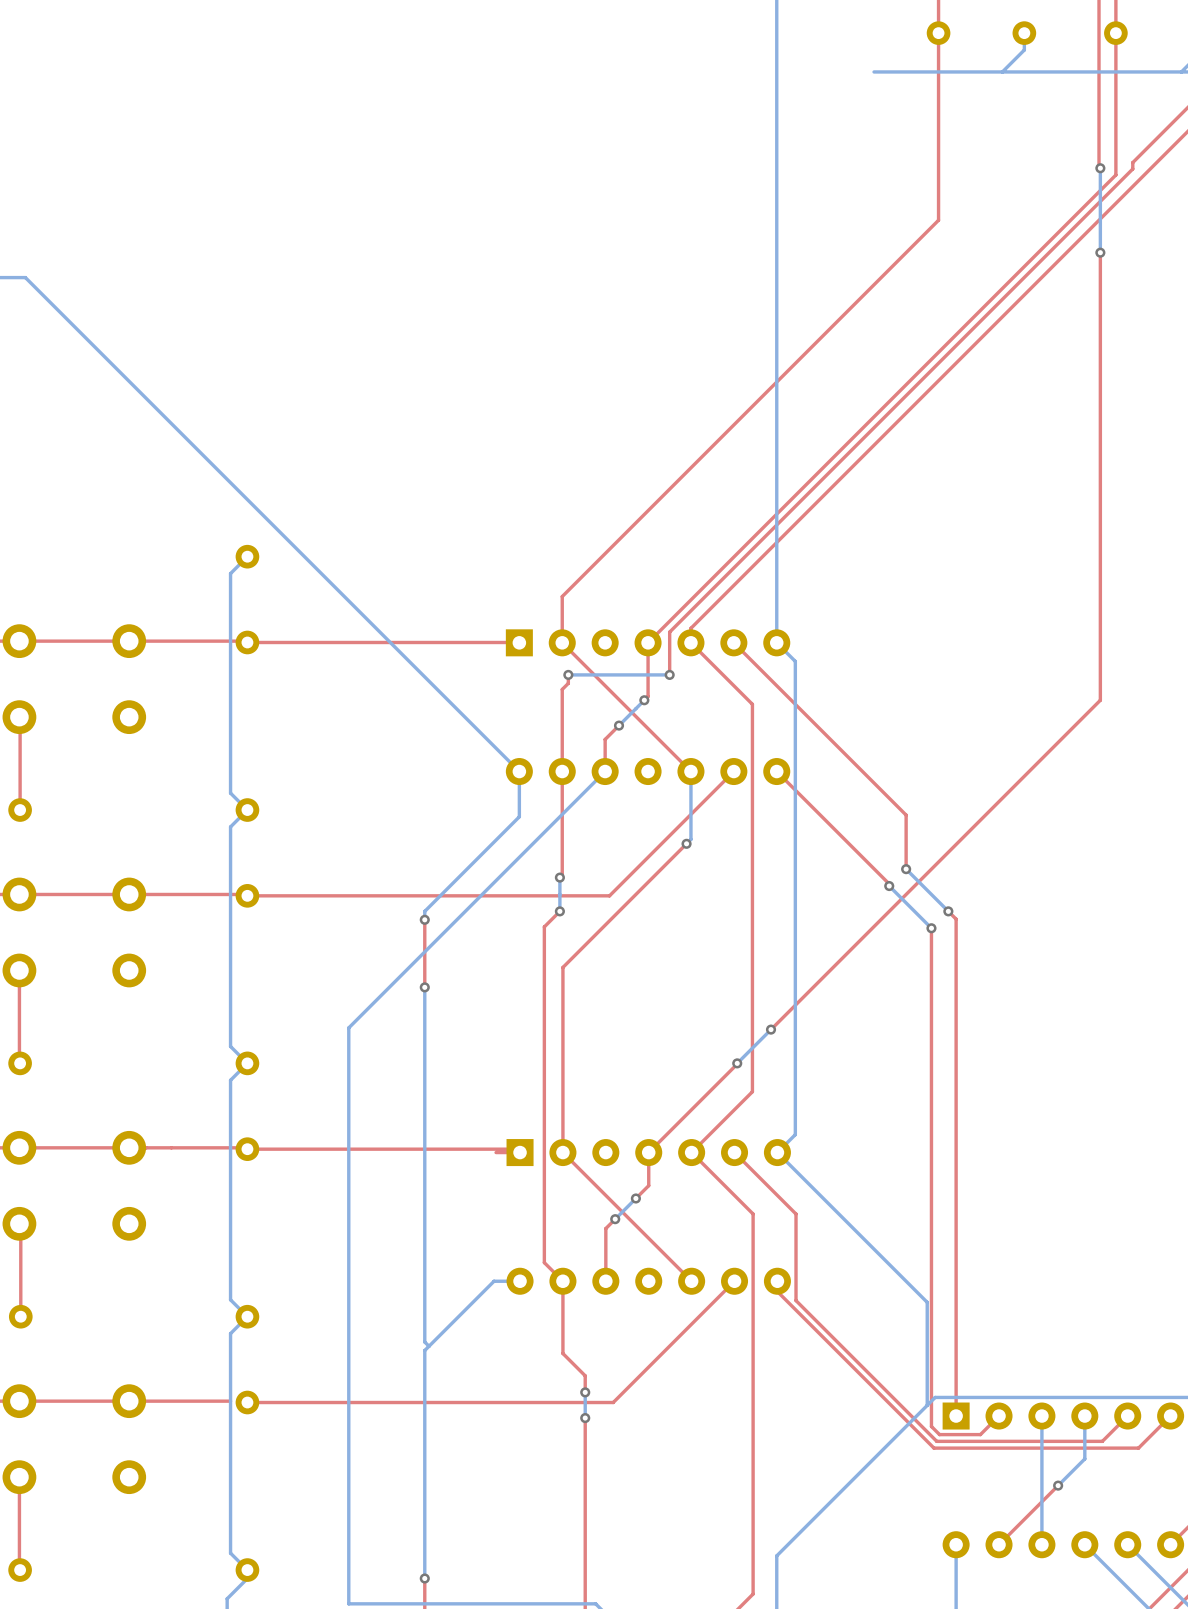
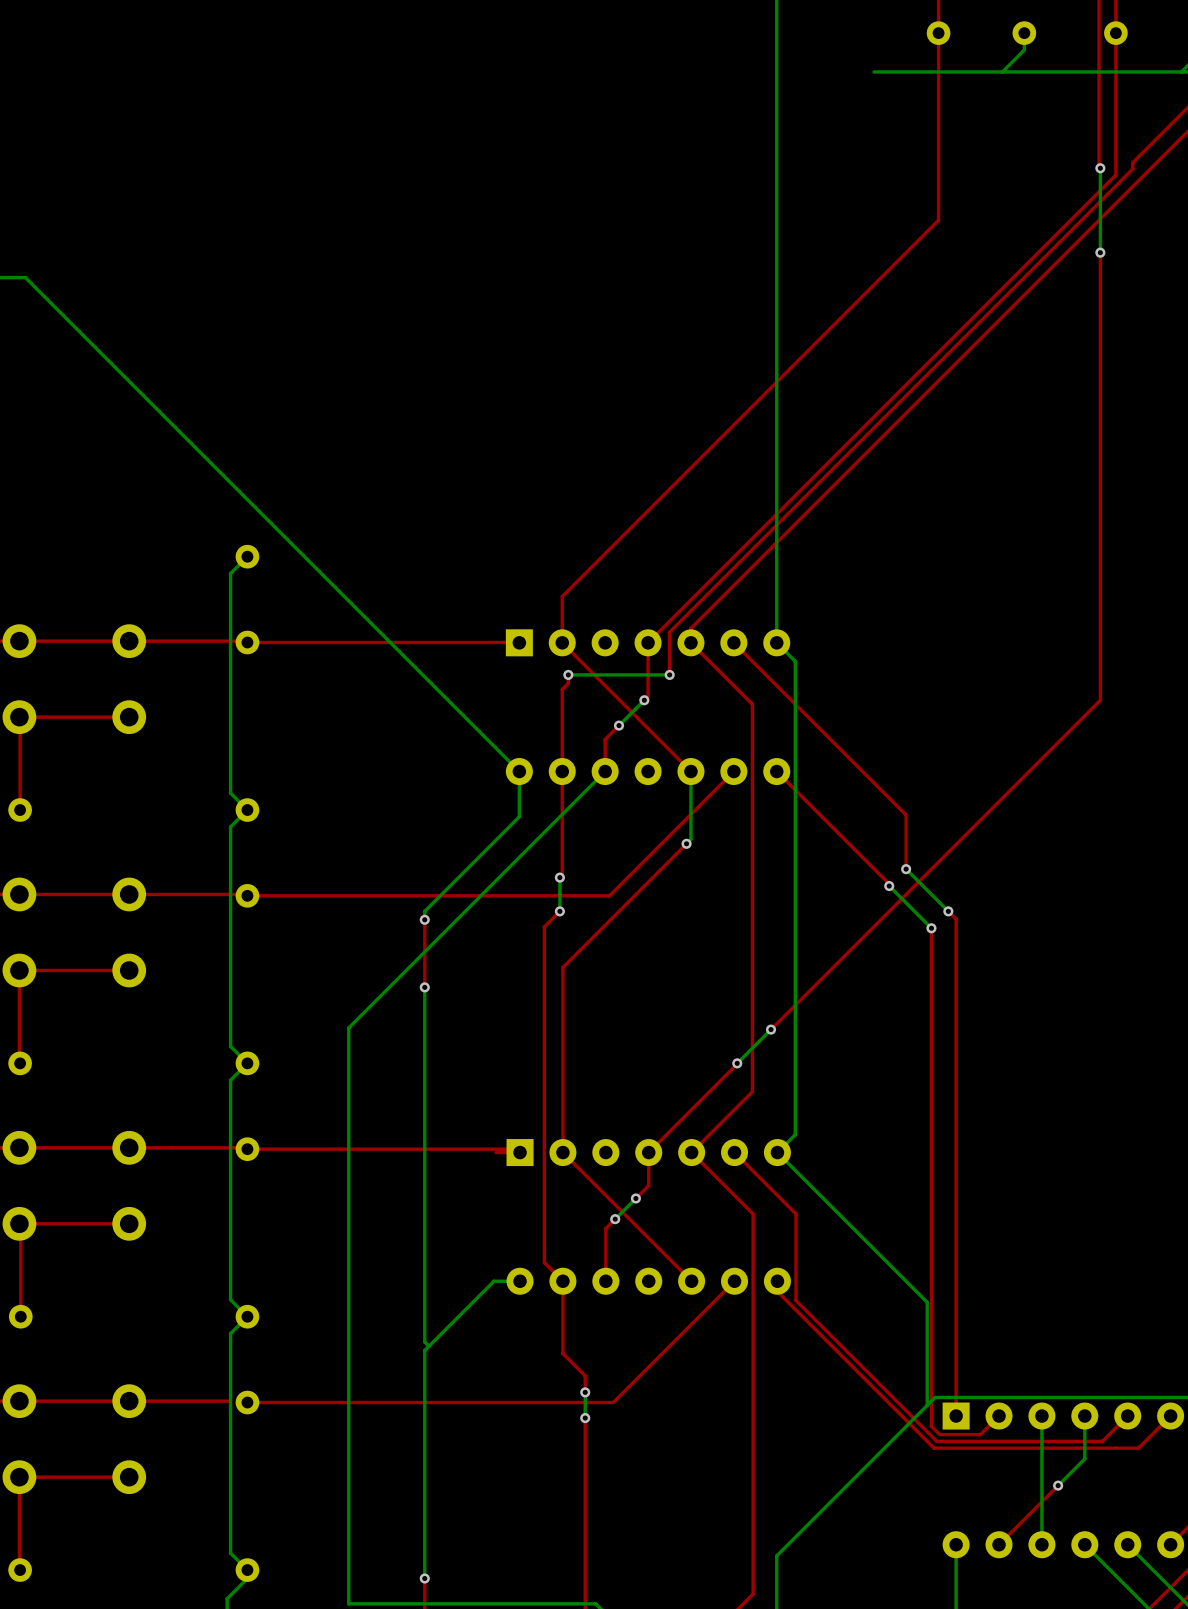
top track: none -> (129, 717) (19, 717)
top track: none -> (129, 970) (19, 970)
top track: none -> (129, 1223) (19, 1223)
top track: none -> (129, 1477) (19, 1477)

